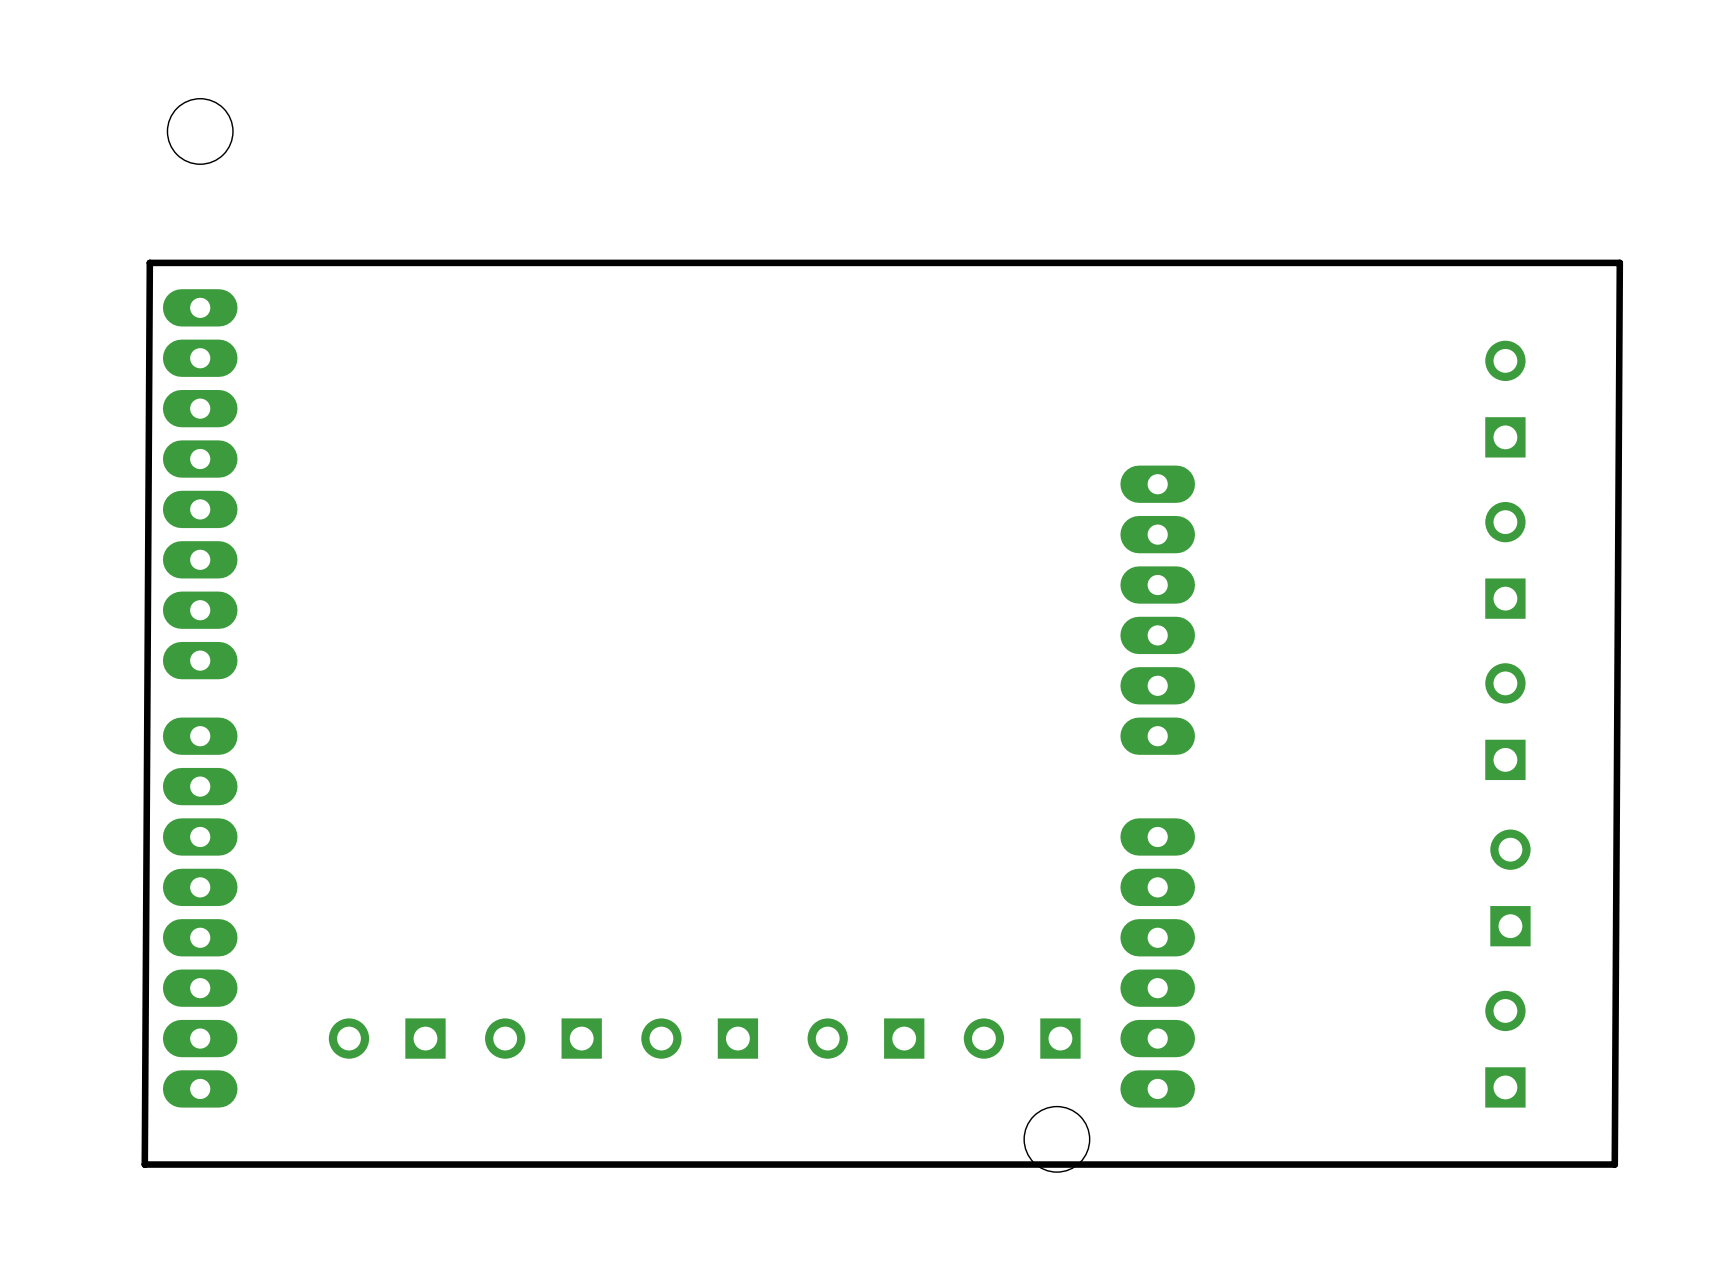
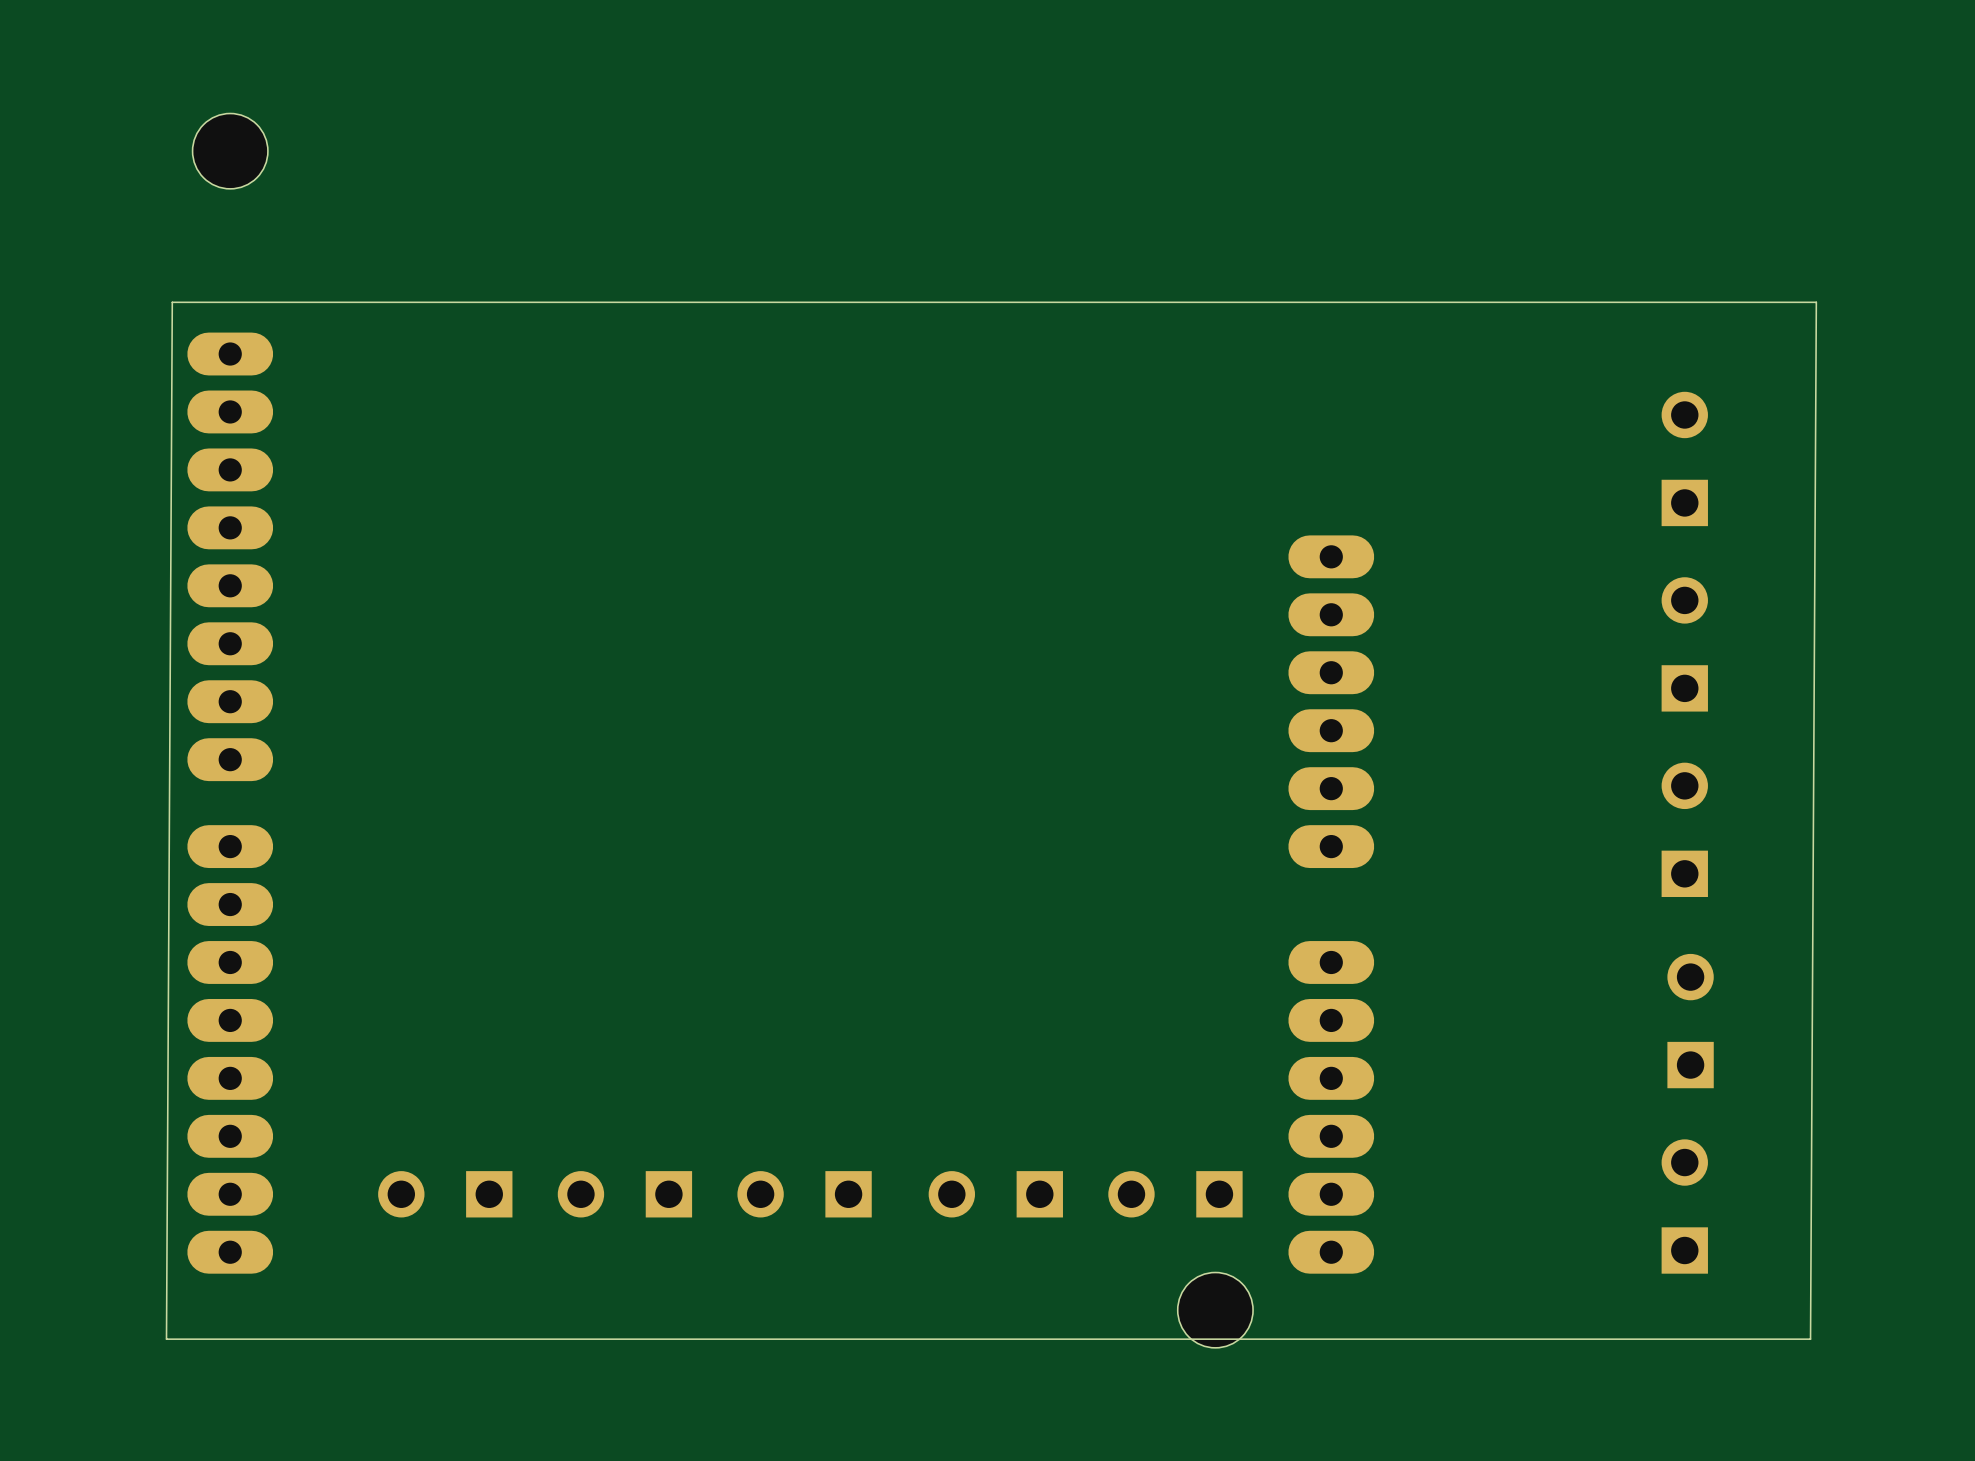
board edge: (1579, 262) (1619, 262) (1614, 1164) (1574, 1164) -> (1816, 302) (1810, 1339)
board edge width: thick (1579, 262) (149, 262) (144, 1164) (1574, 1164) -> thin (1816, 302) (172, 302) (166, 1339) (1810, 1339)
part position: (1505, 399) -> (1684, 458)
part position: (1505, 560) -> (1684, 644)
part position: (1505, 721) -> (1684, 829)
part position: (1510, 887) -> (1690, 1021)
part position: (1505, 1049) -> (1684, 1206)

